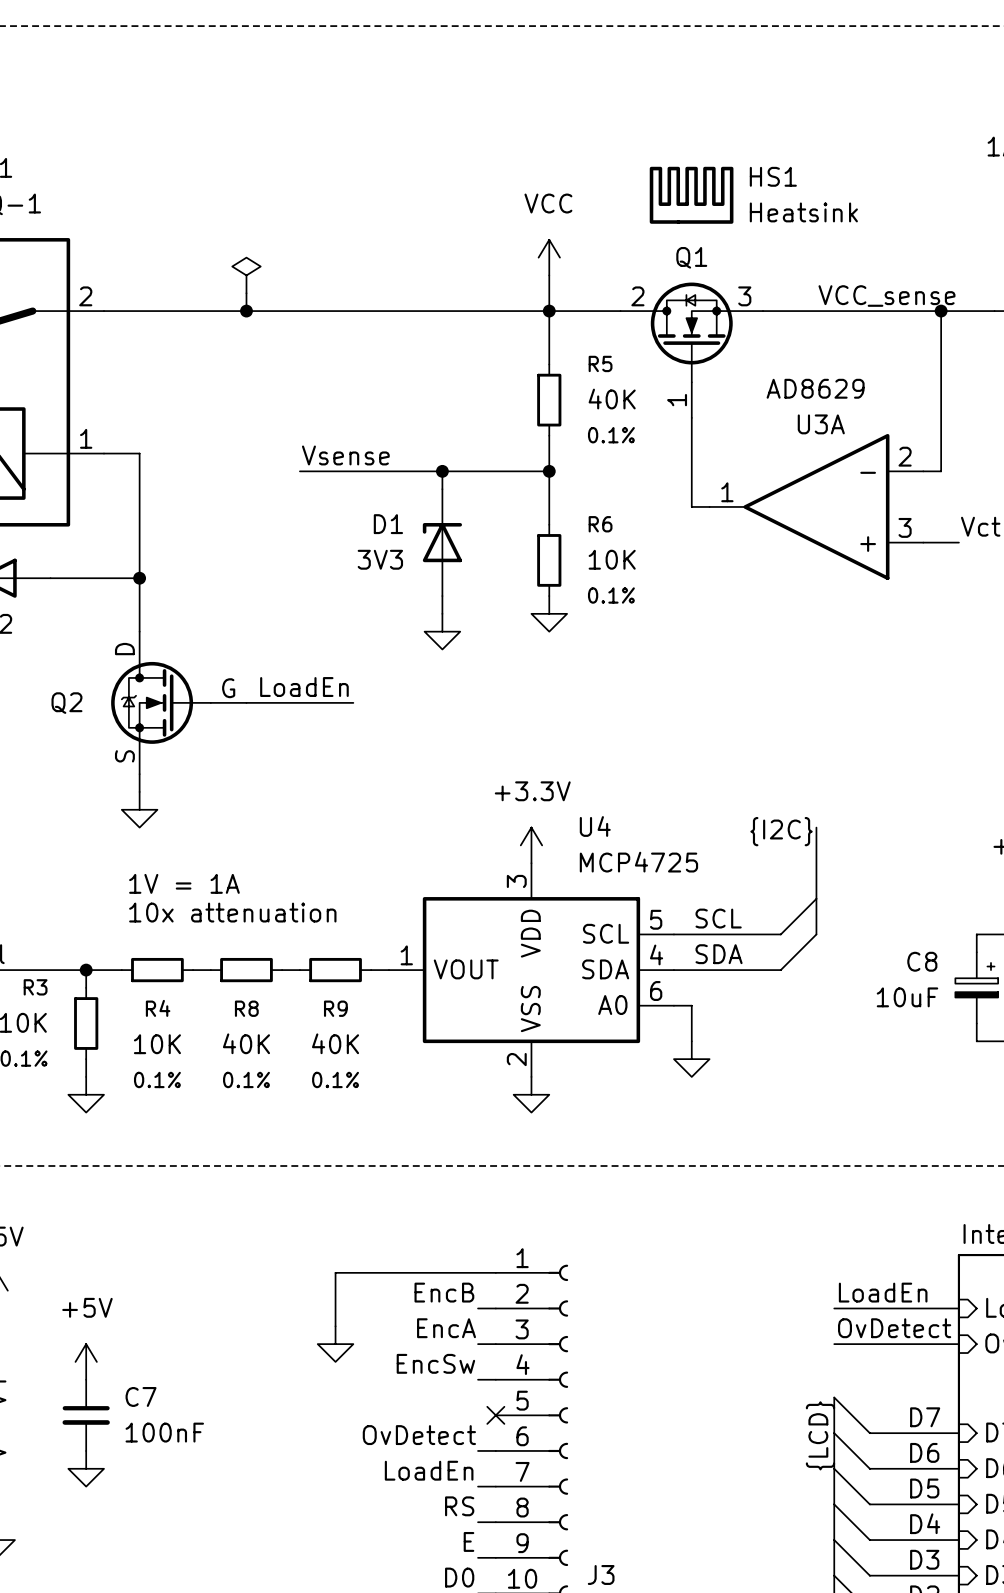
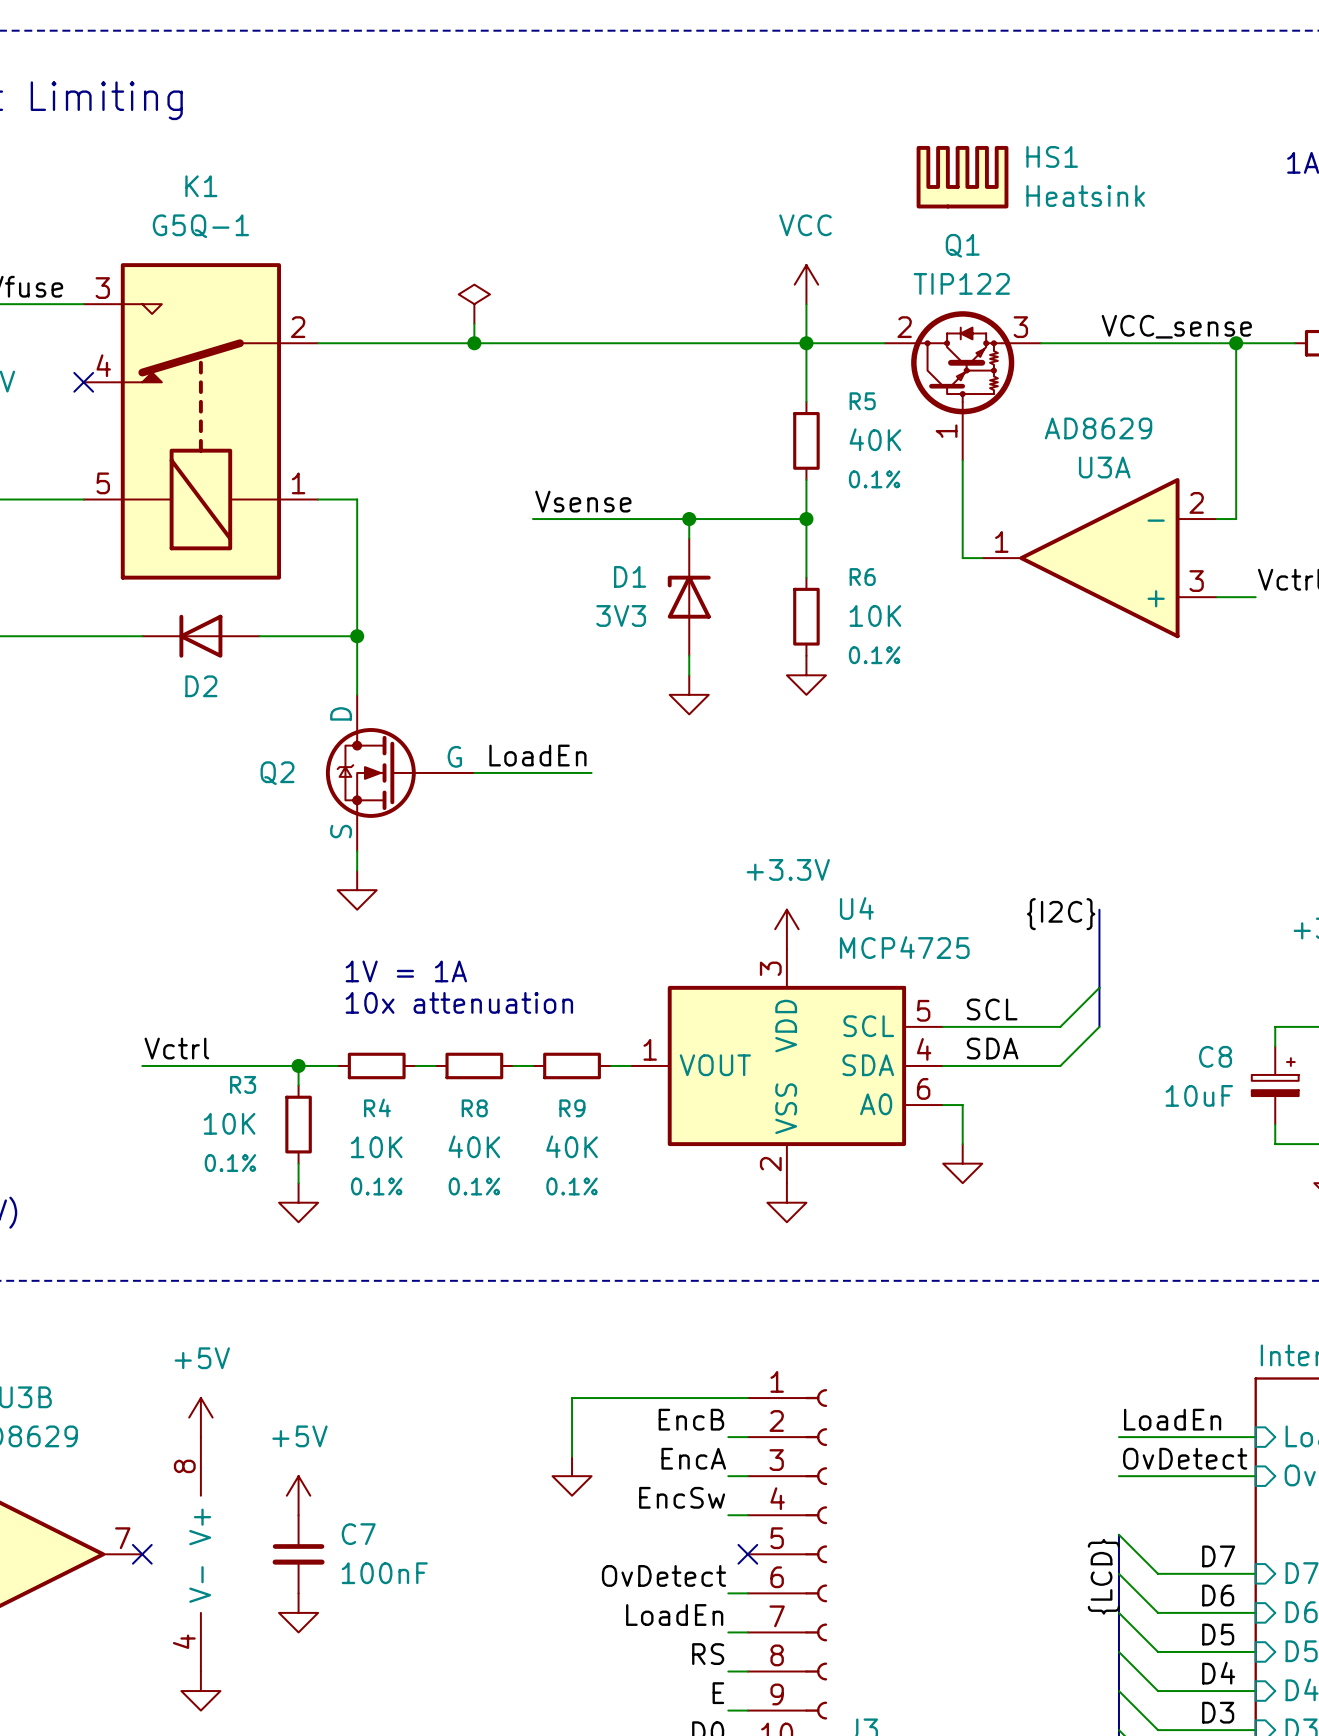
HS1 position: (691, 195) -> (962, 177)
Q1 value: none -> TIP122 (961, 283)
Q1 name position: Q1 (691, 257) -> Q1 (962, 245)
Q1 symbol: [620, 282, 764, 418] -> [884, 311, 1041, 461]

